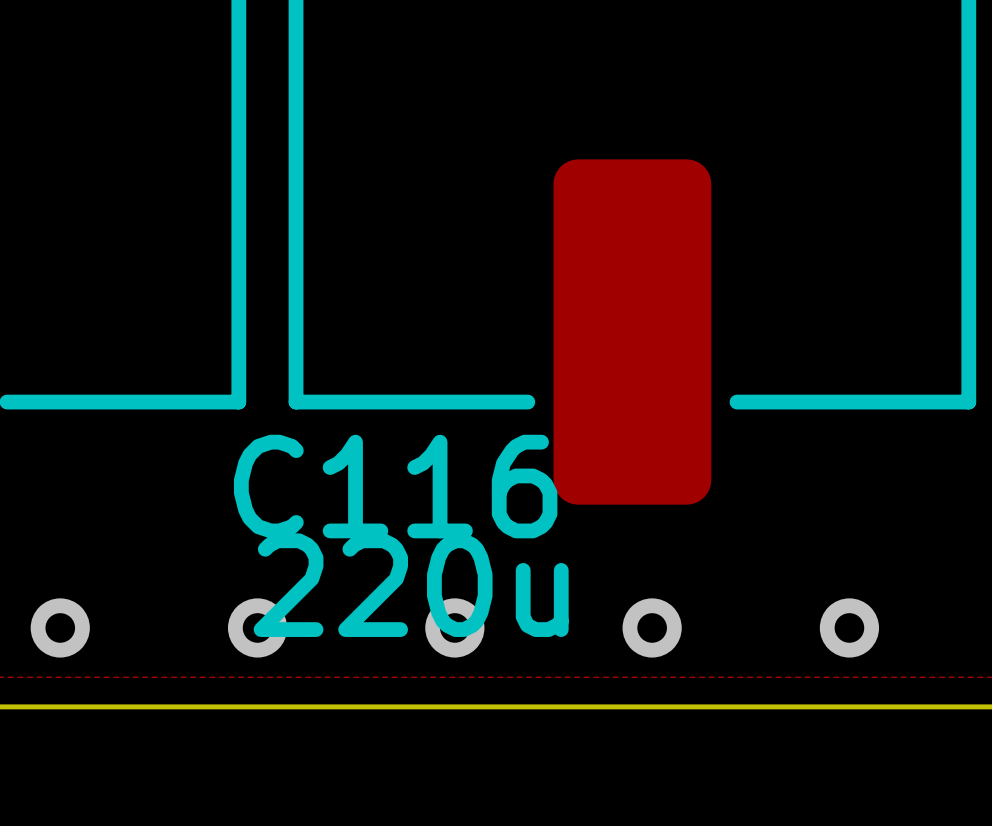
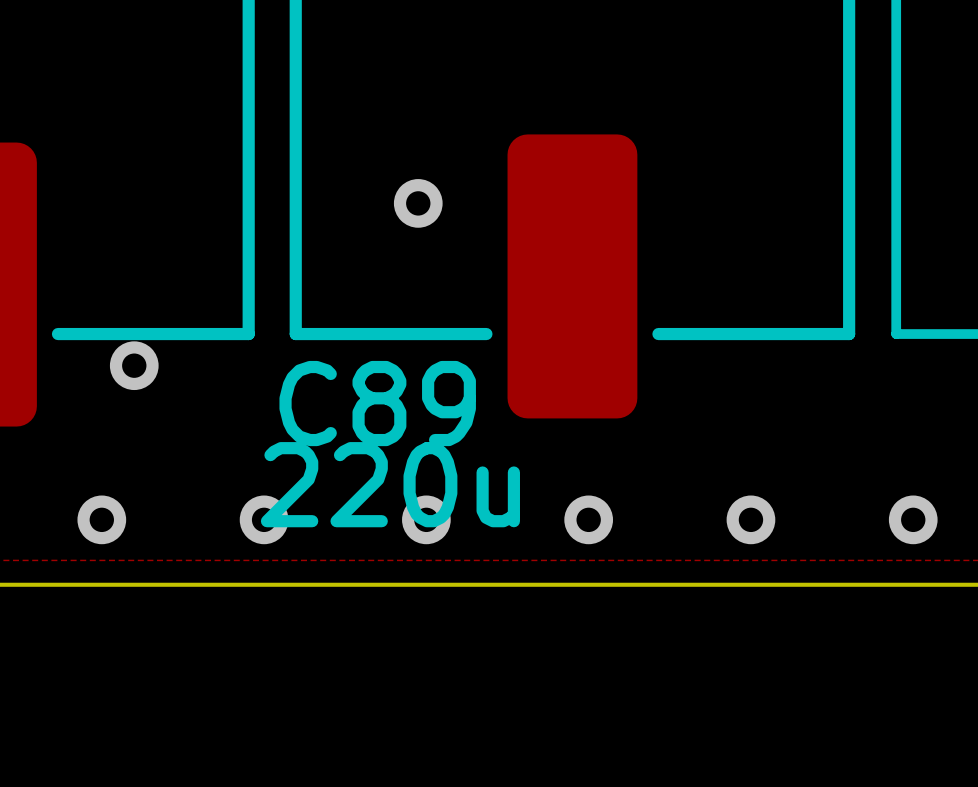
via: none -> (418, 203)
via: none -> (134, 365)
C116 name: C116 (395, 486) -> C89 (377, 403)

